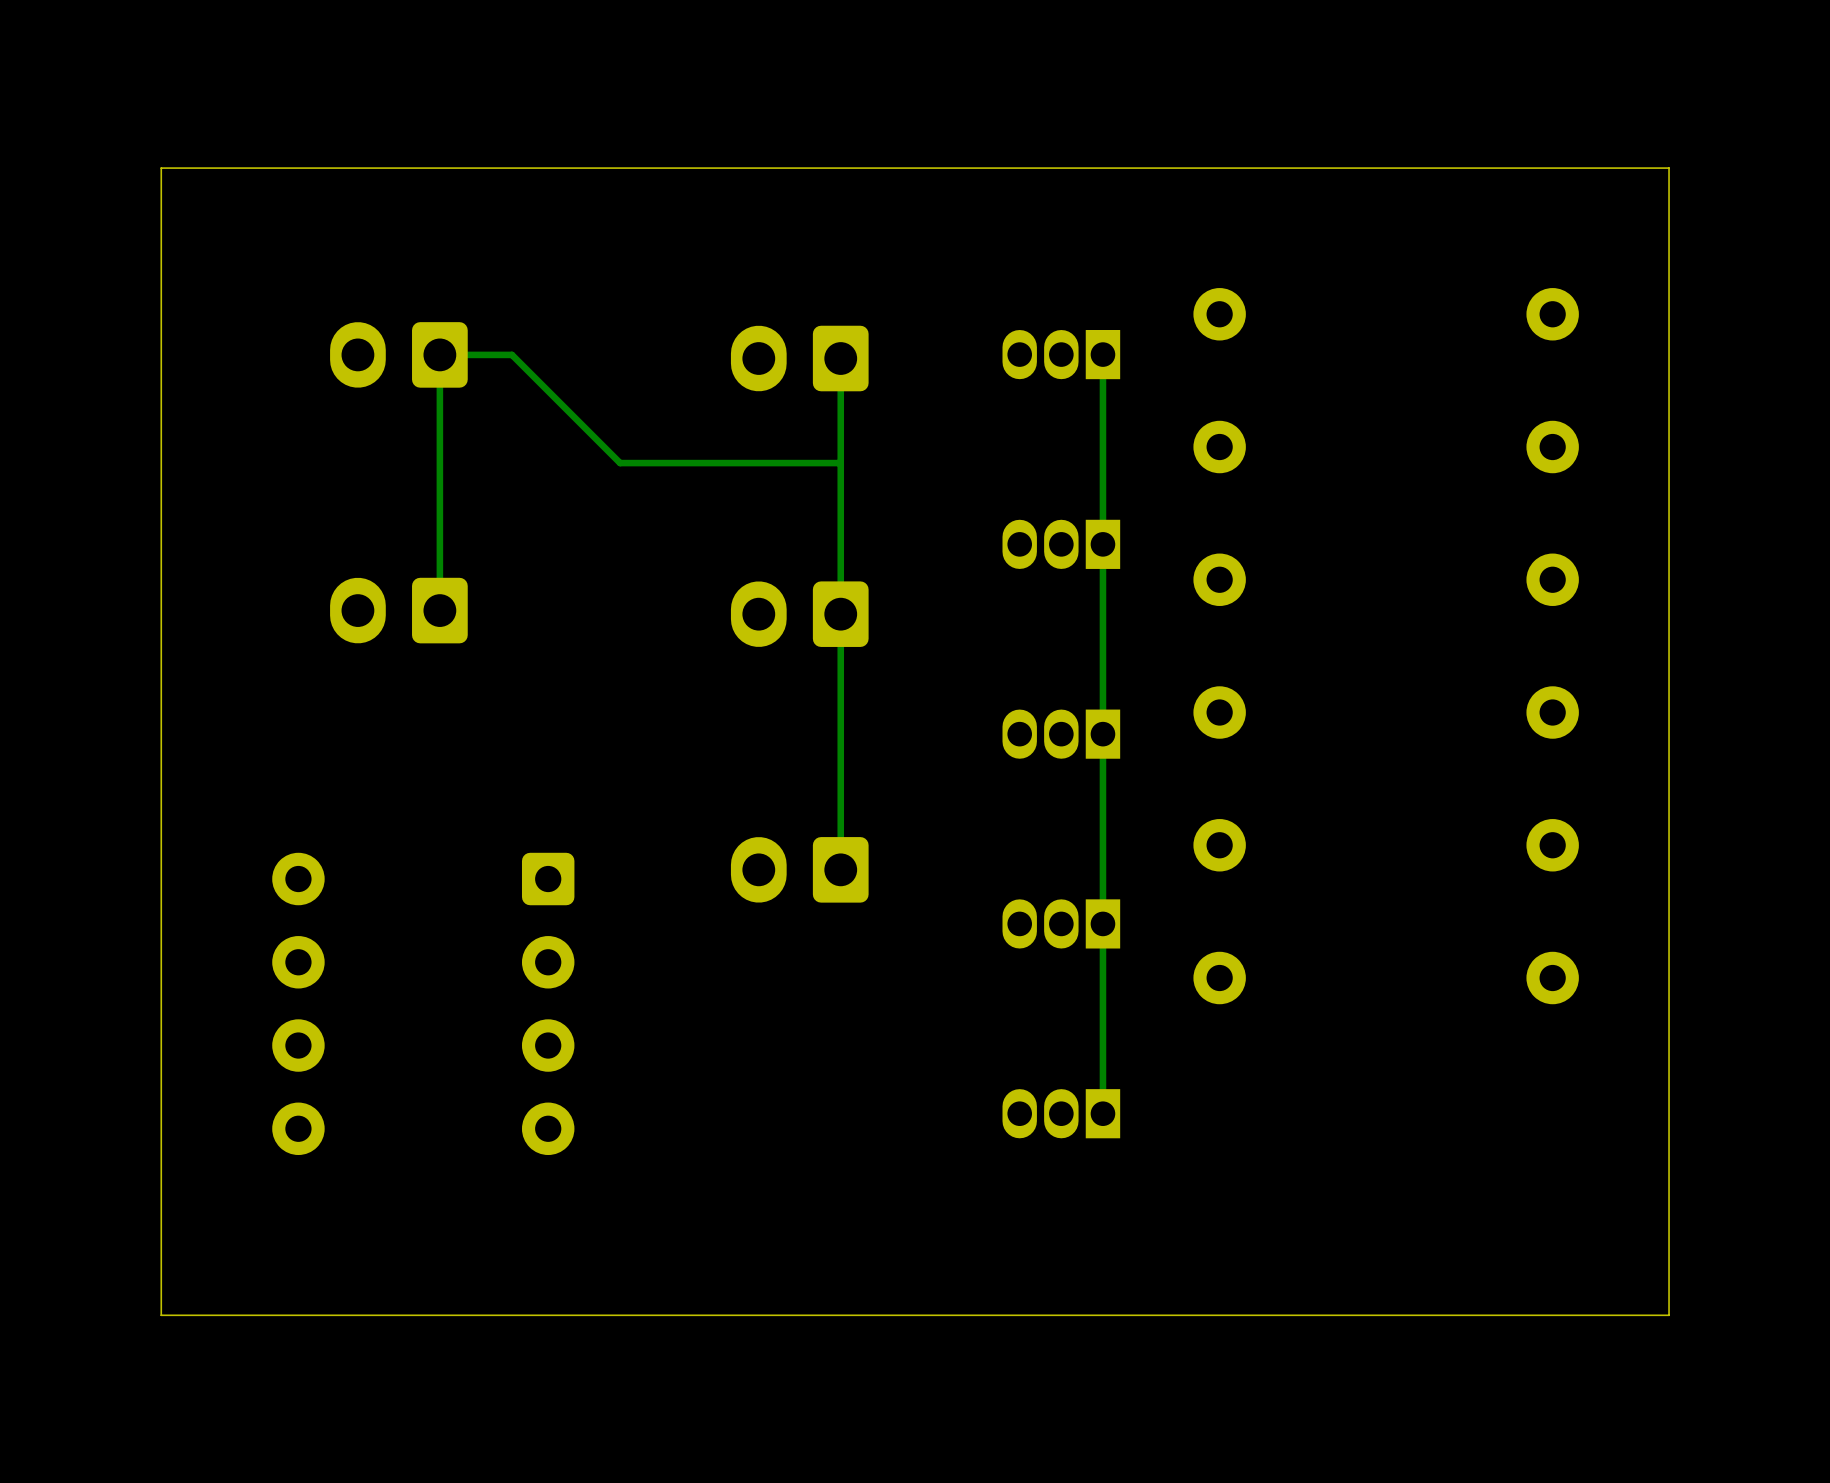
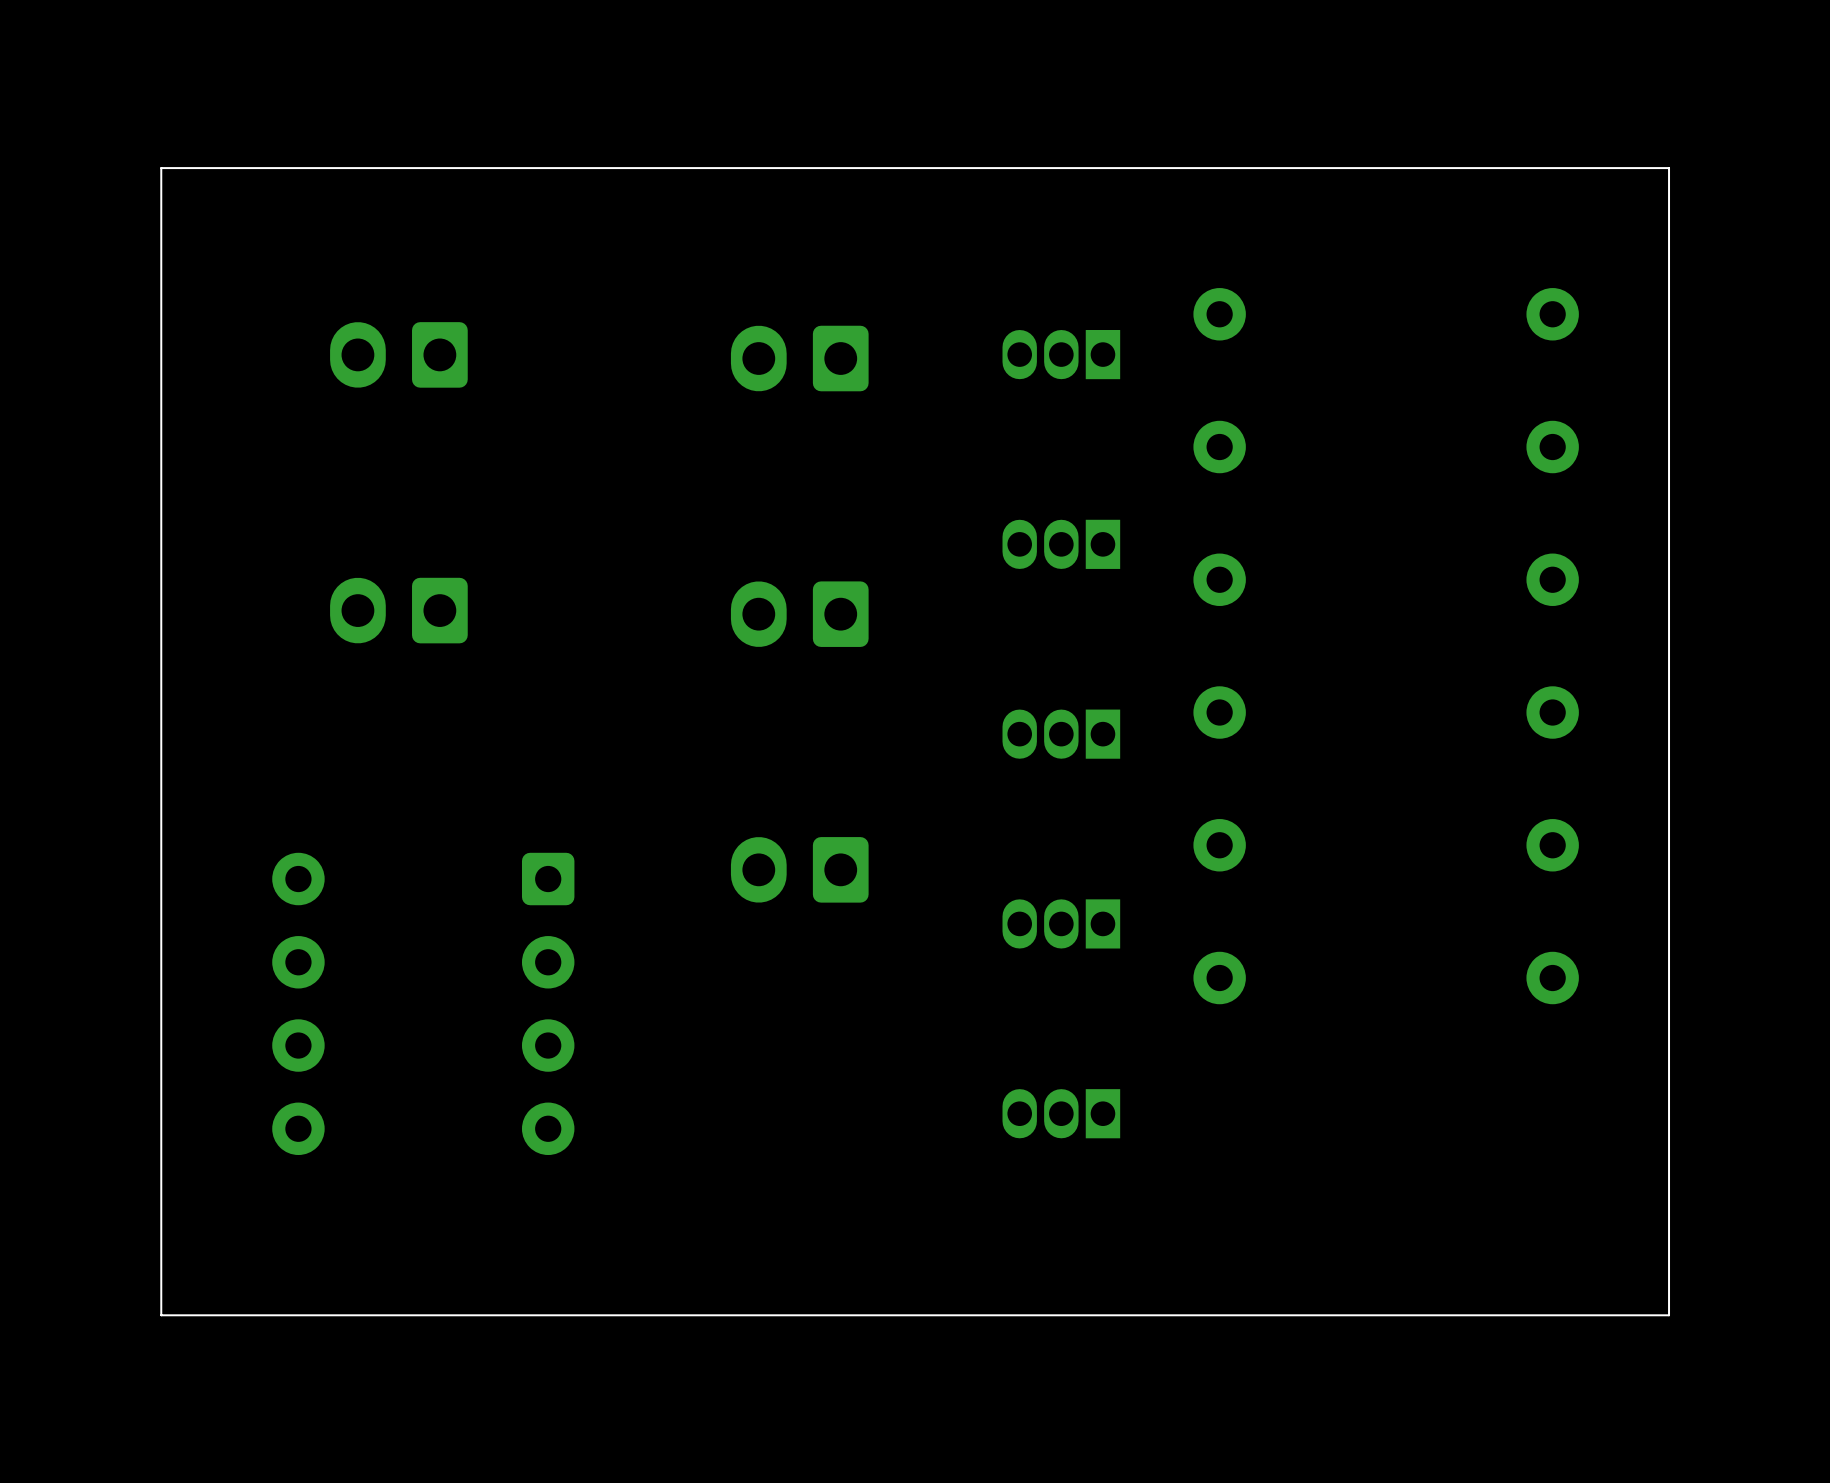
track: (1102, 354) (1102, 1113) -> none
track: (840, 358) (840, 869) -> none
track: (840, 463) (620, 463) (511, 354) (439, 354) (439, 610) -> none

